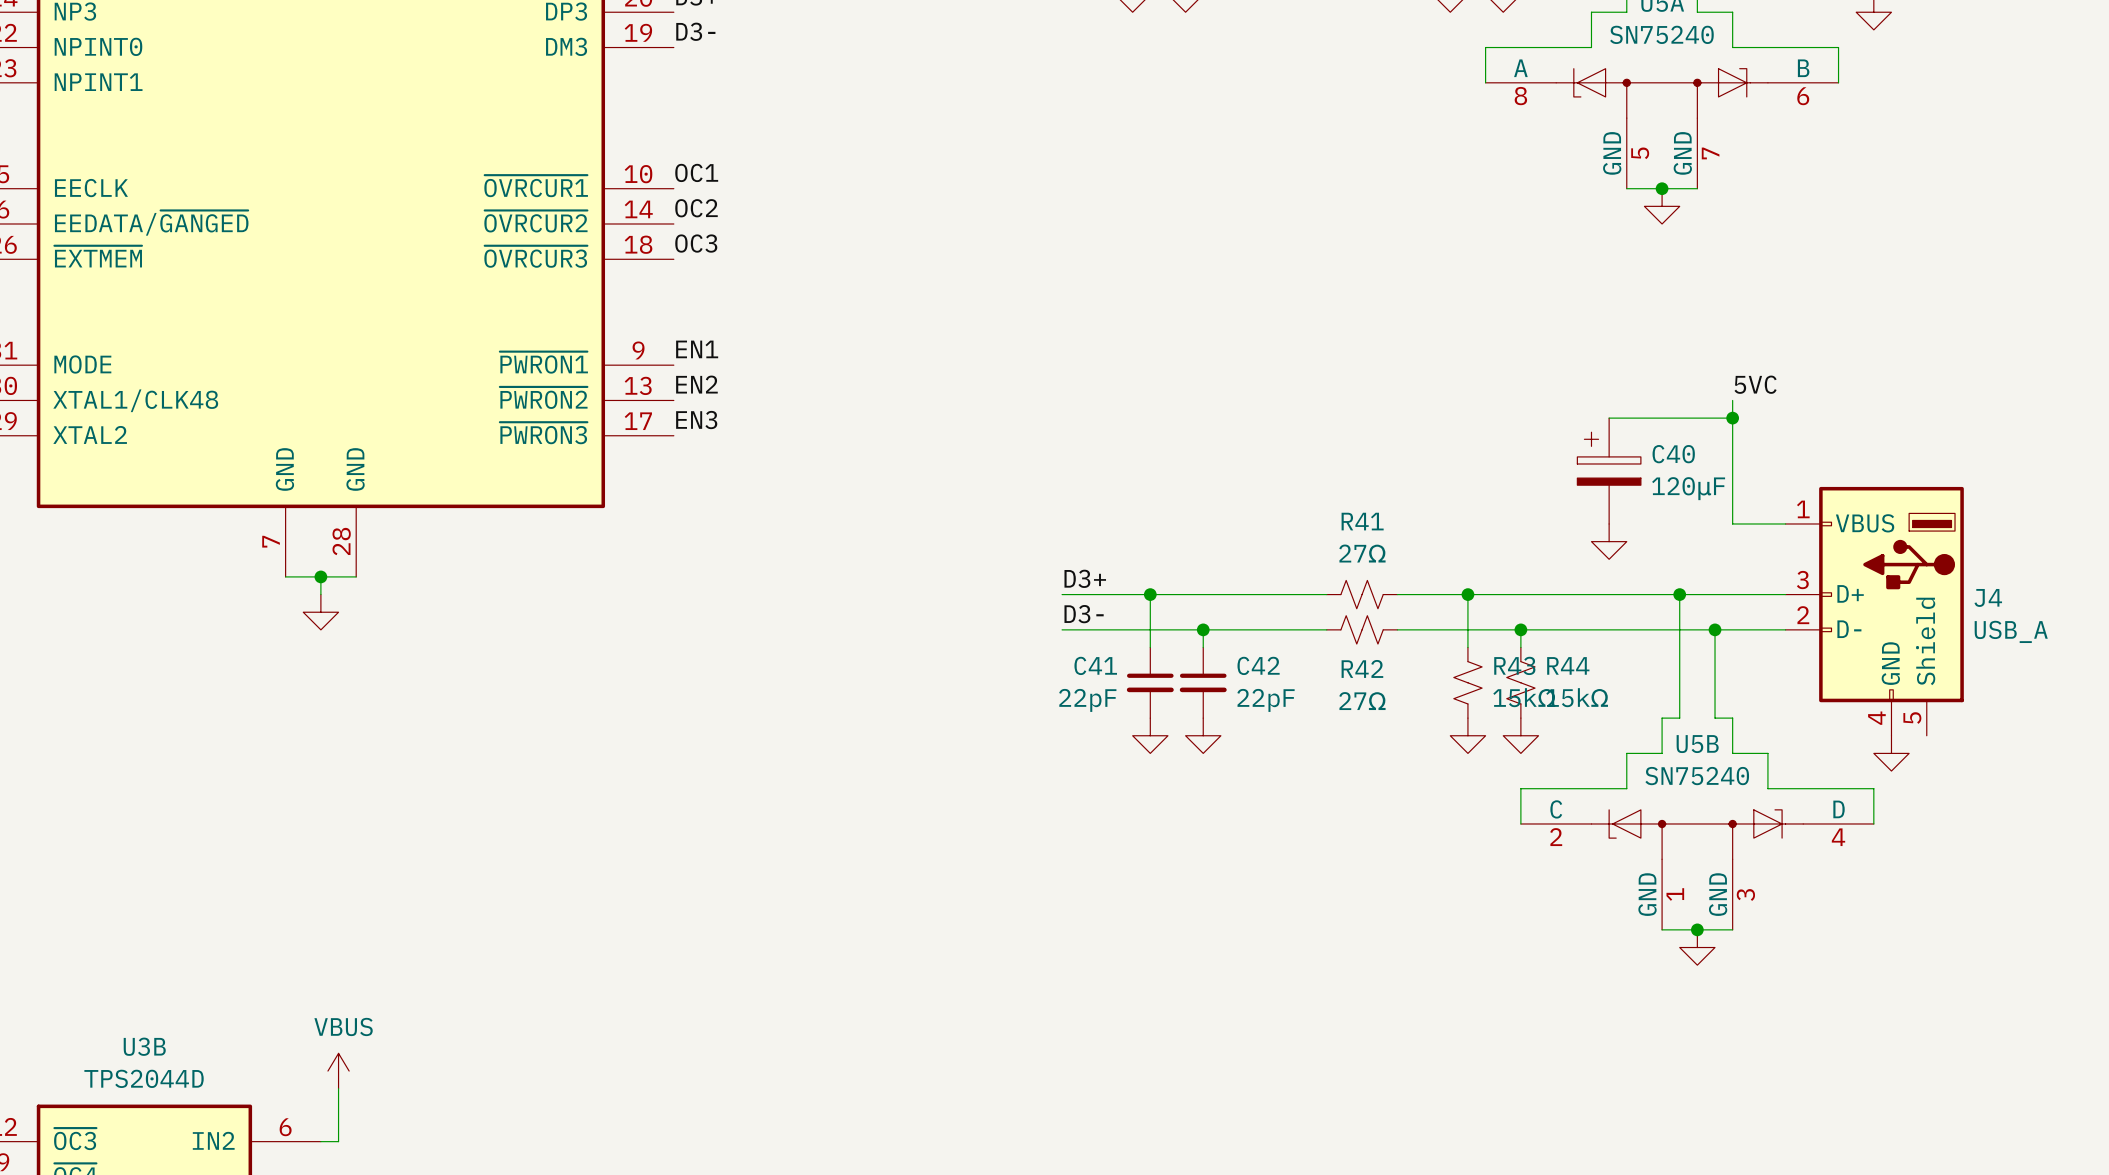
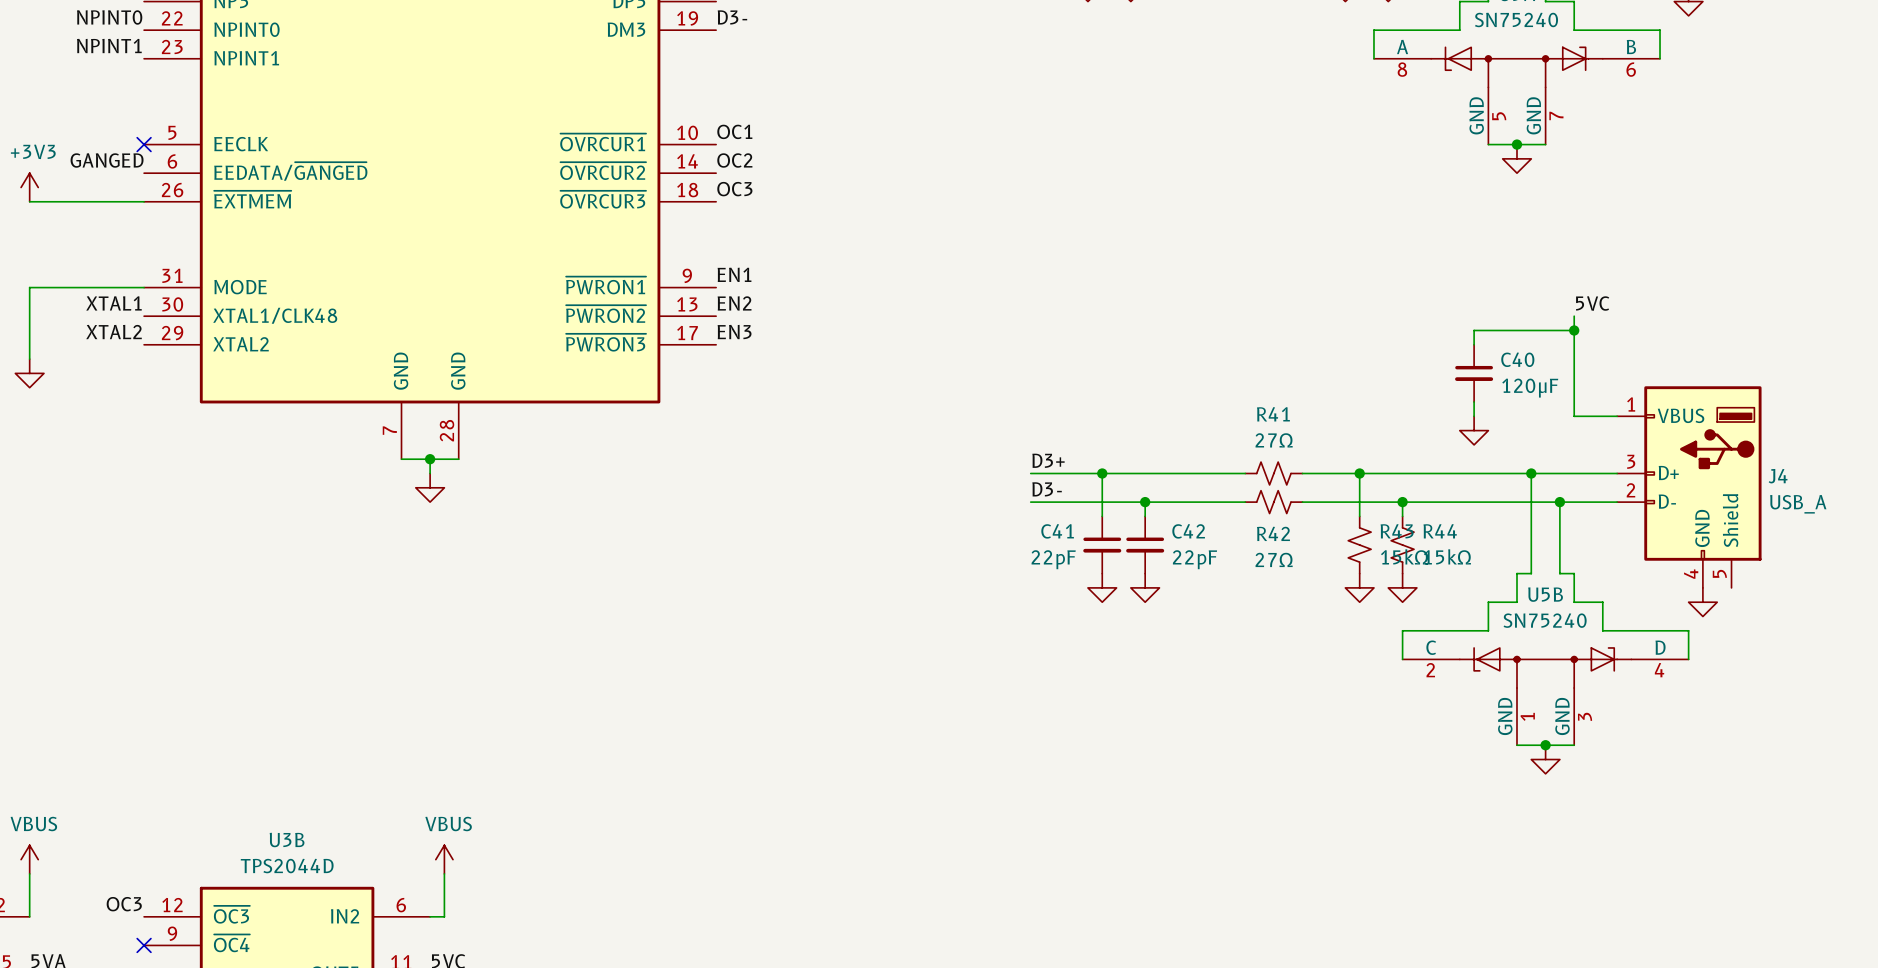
C40 symbol: [1577, 418, 1641, 524] -> [1455, 344, 1494, 402]

